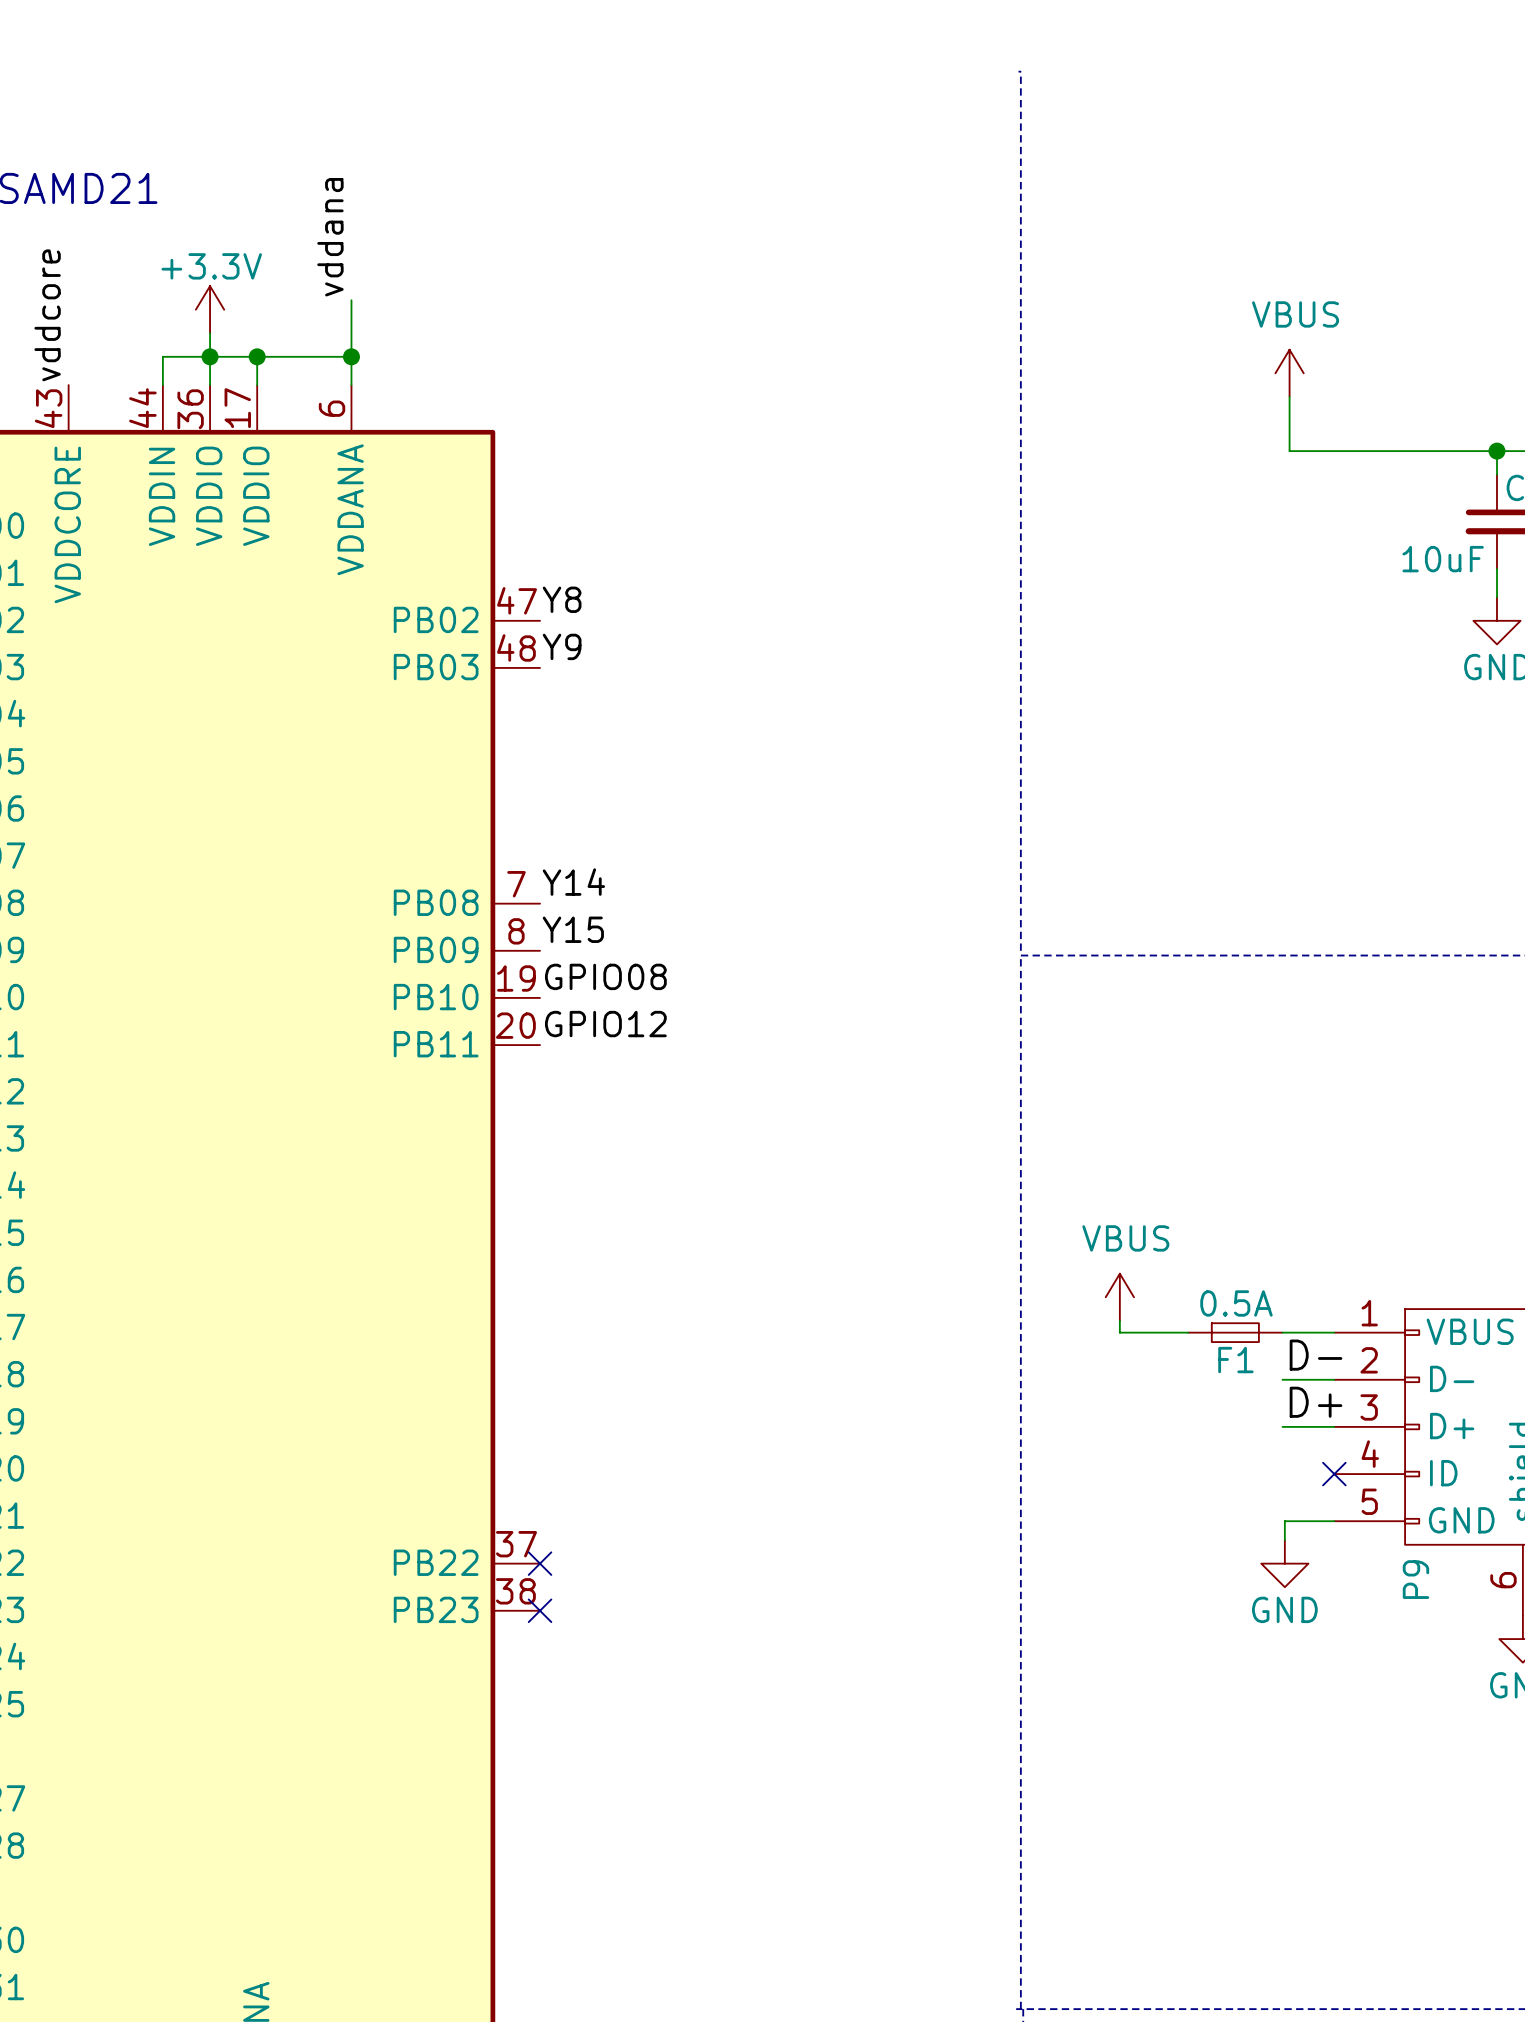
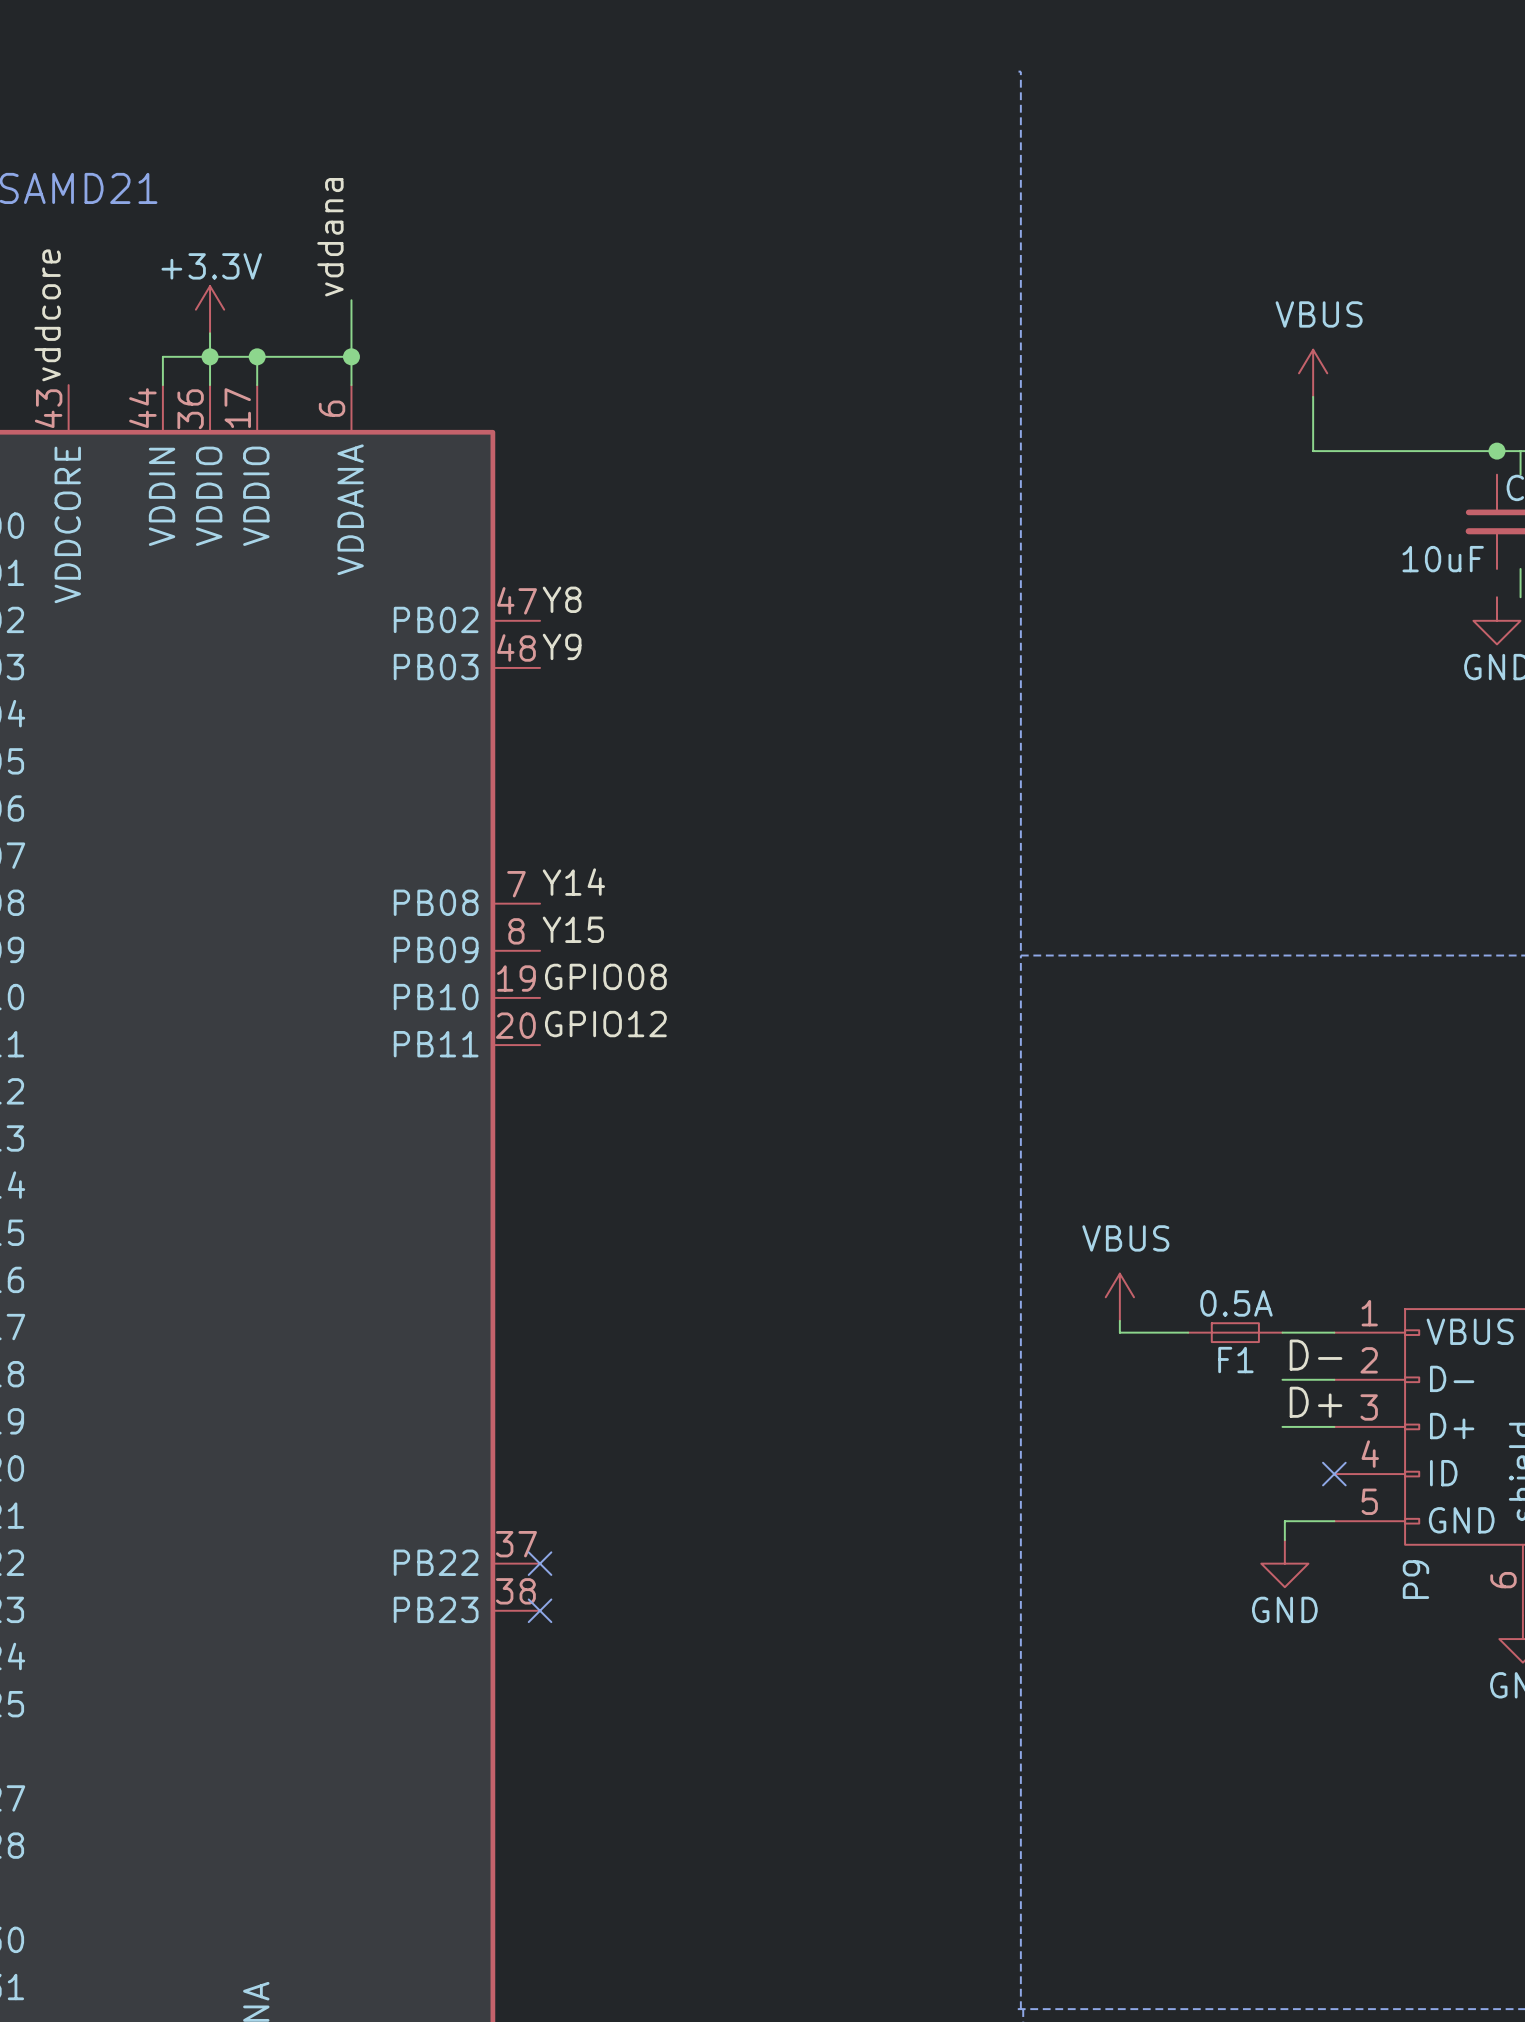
power symbol position: VBUS (1289, 373) -> VBUS (1313, 373)
wire: (1289, 396) (1289, 451) (1313, 451) -> (1313, 396) (1313, 451)
wire: (1496, 451) (1496, 474) -> (1520, 451) (1520, 474)
wire: (1496, 568) (1496, 597) -> (1520, 568) (1520, 597)

